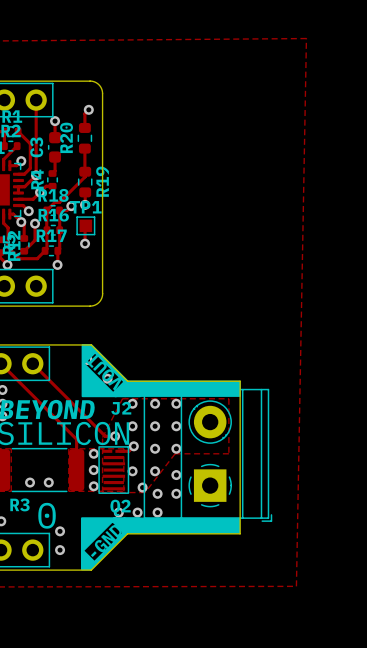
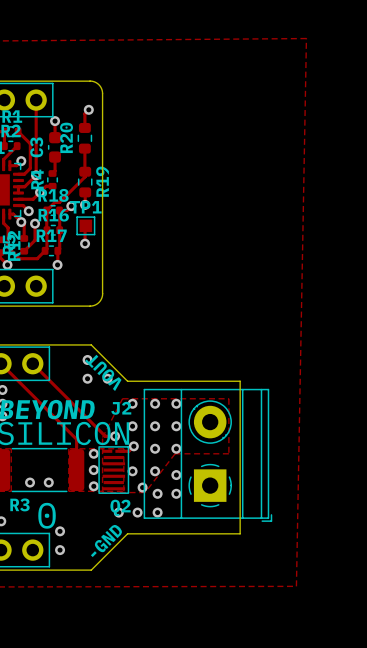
drawing: [81, 344, 241, 398] -> none
drawing: [80, 517, 241, 571] -> none

